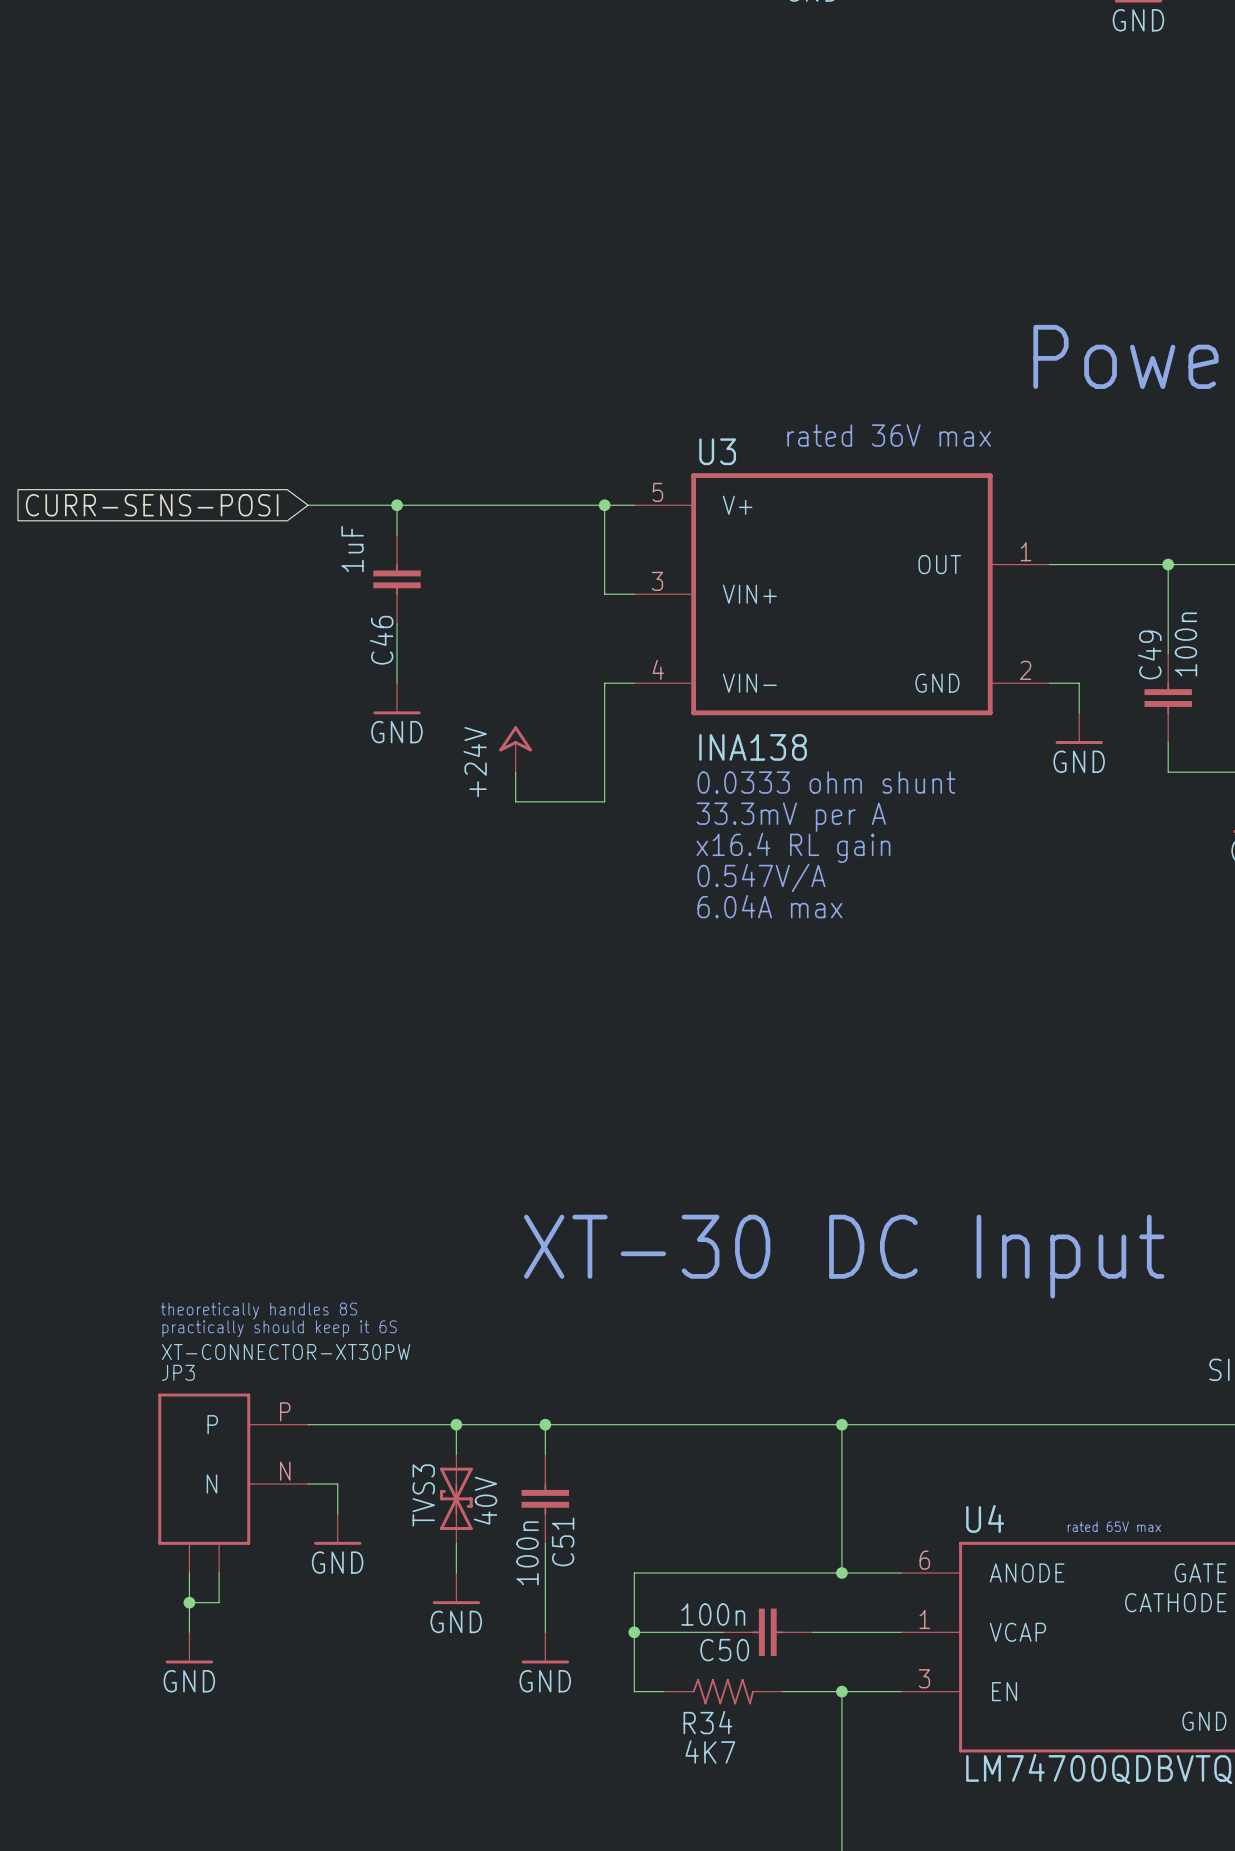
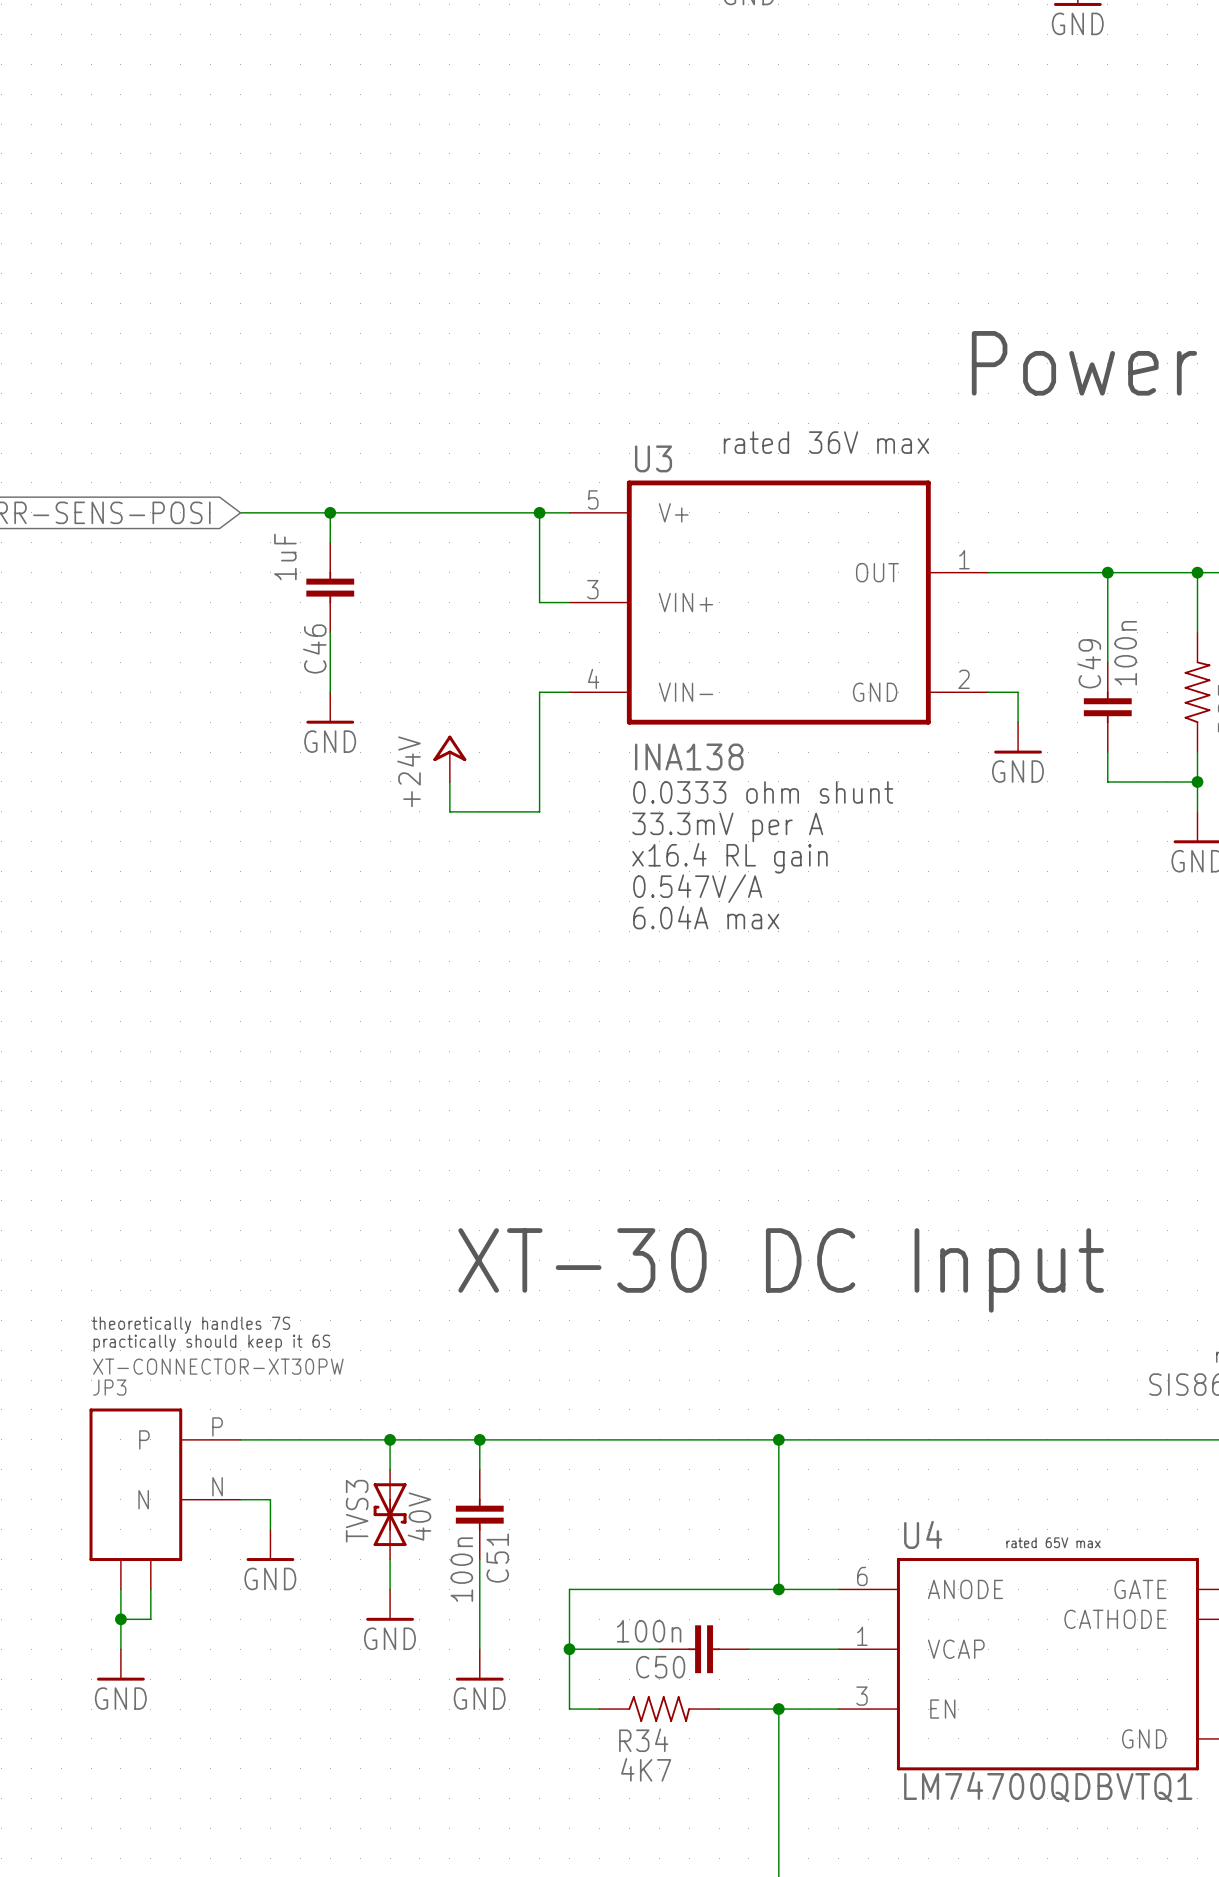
text: theoretically handles 8S (259, 1311) -> theoretically handles 7S (191, 1325)

